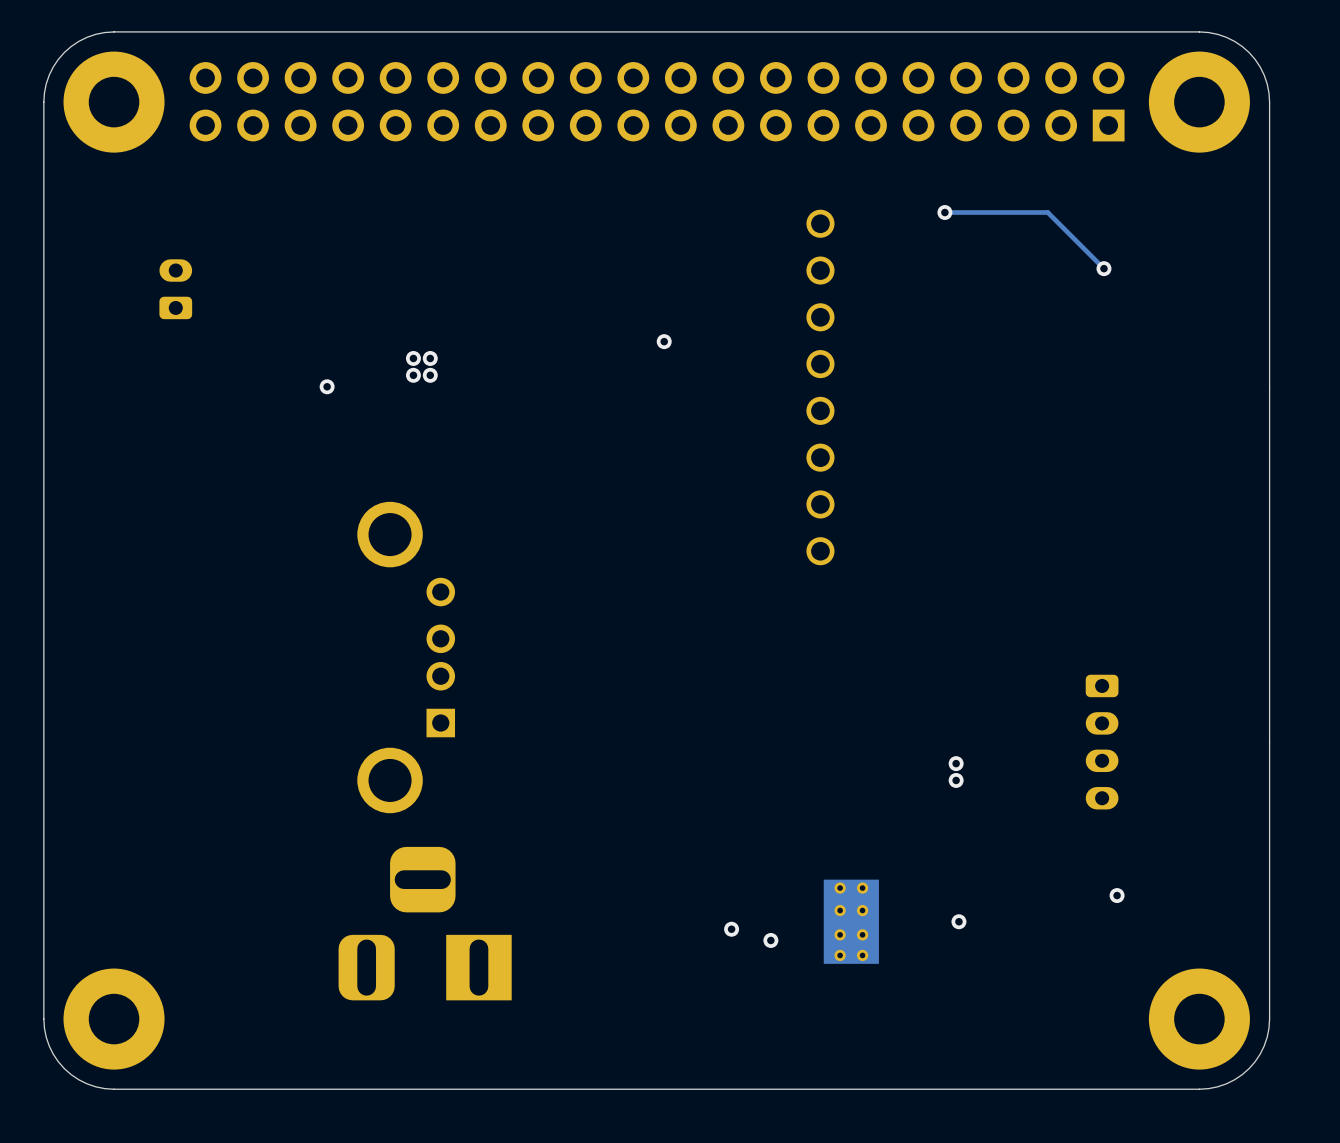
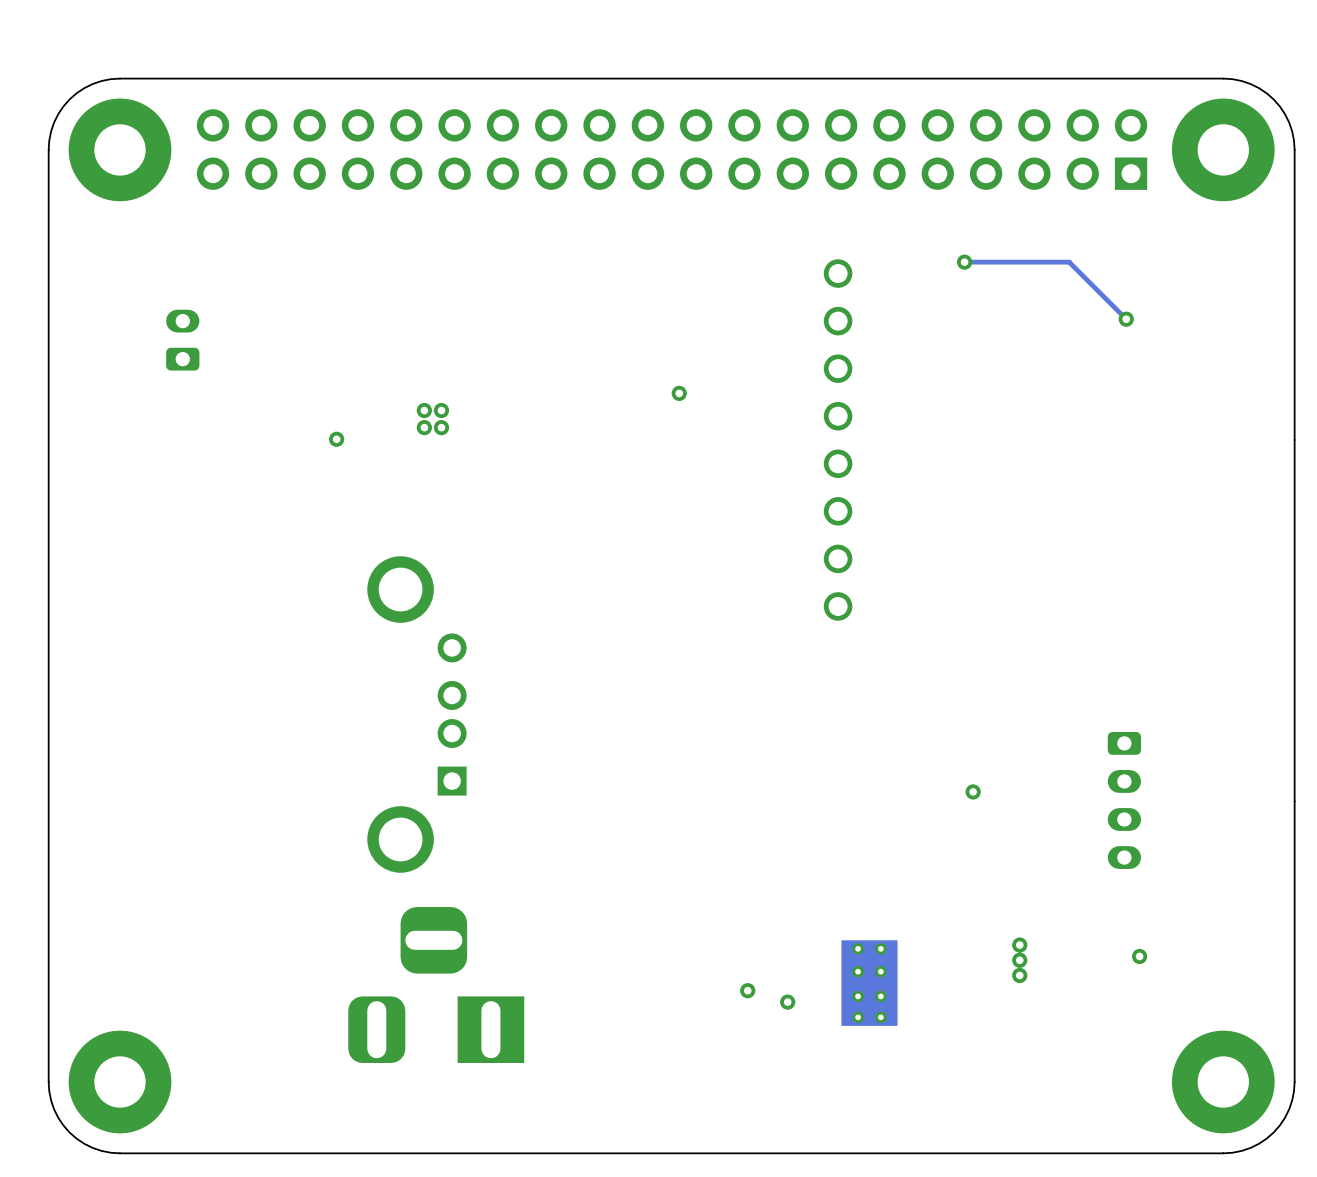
via: none -> (973, 791)
via: (956, 763) -> none
via: (956, 780) -> none
via: none -> (1019, 945)
via: none -> (1019, 960)
via: none -> (1019, 975)
via: (958, 921) -> none

